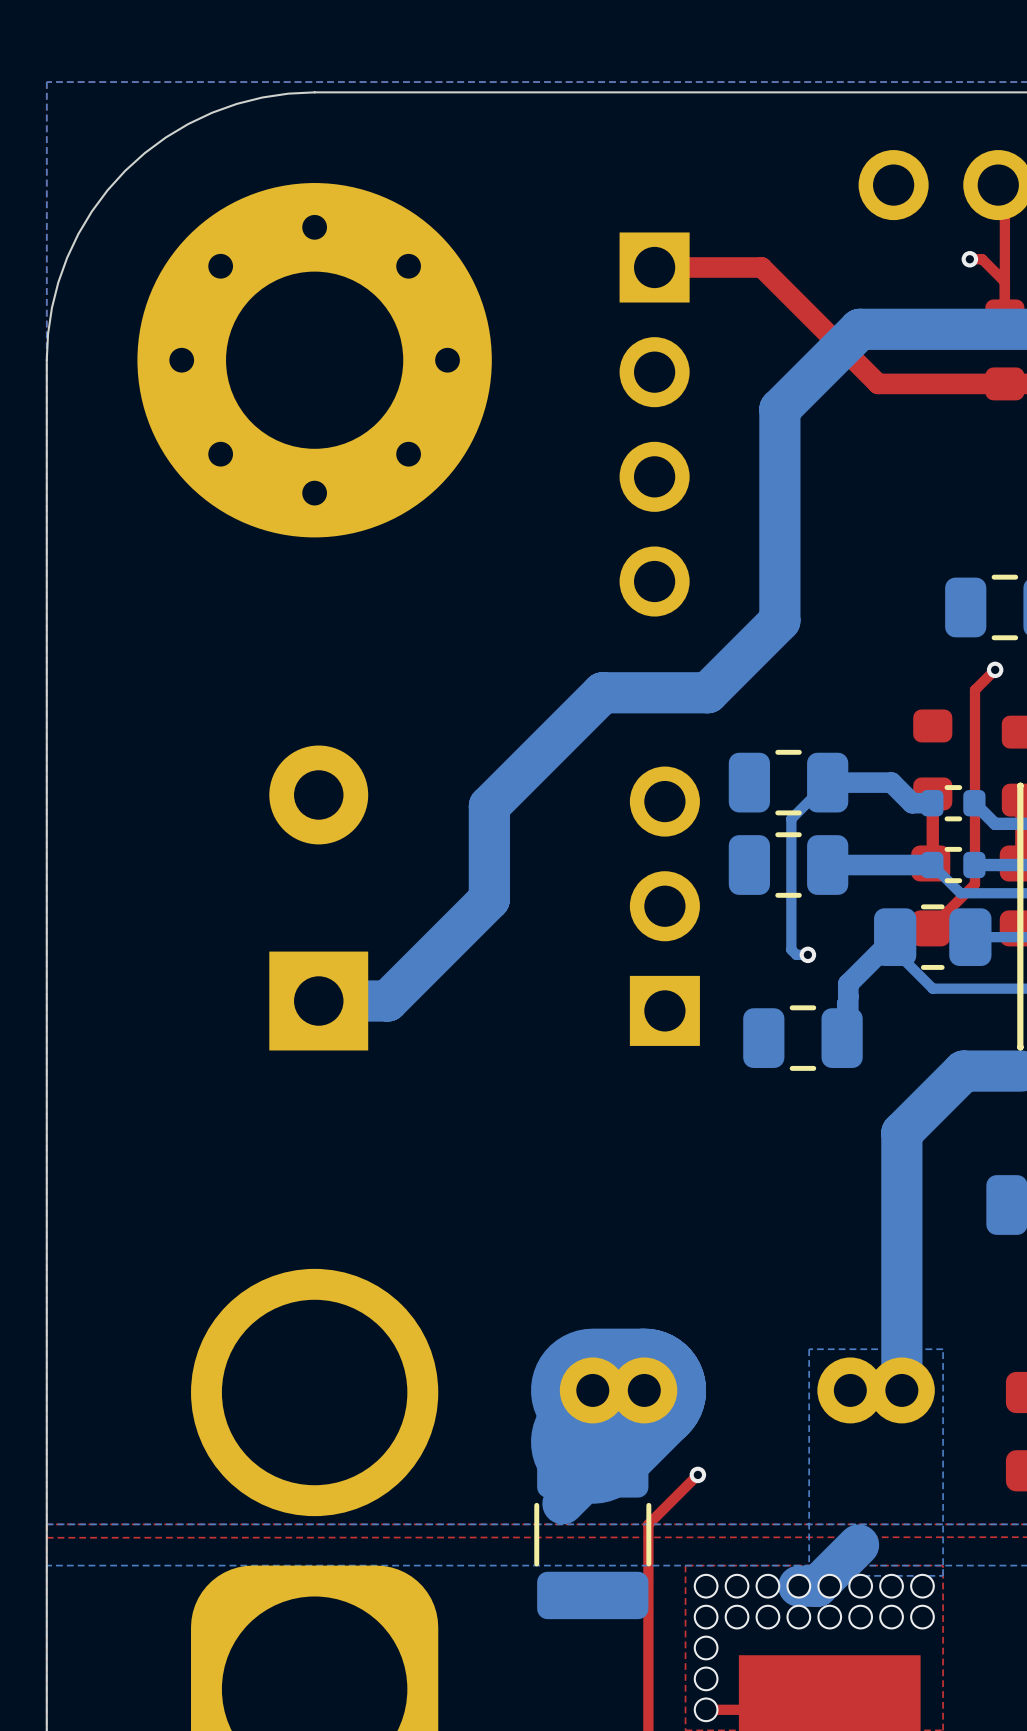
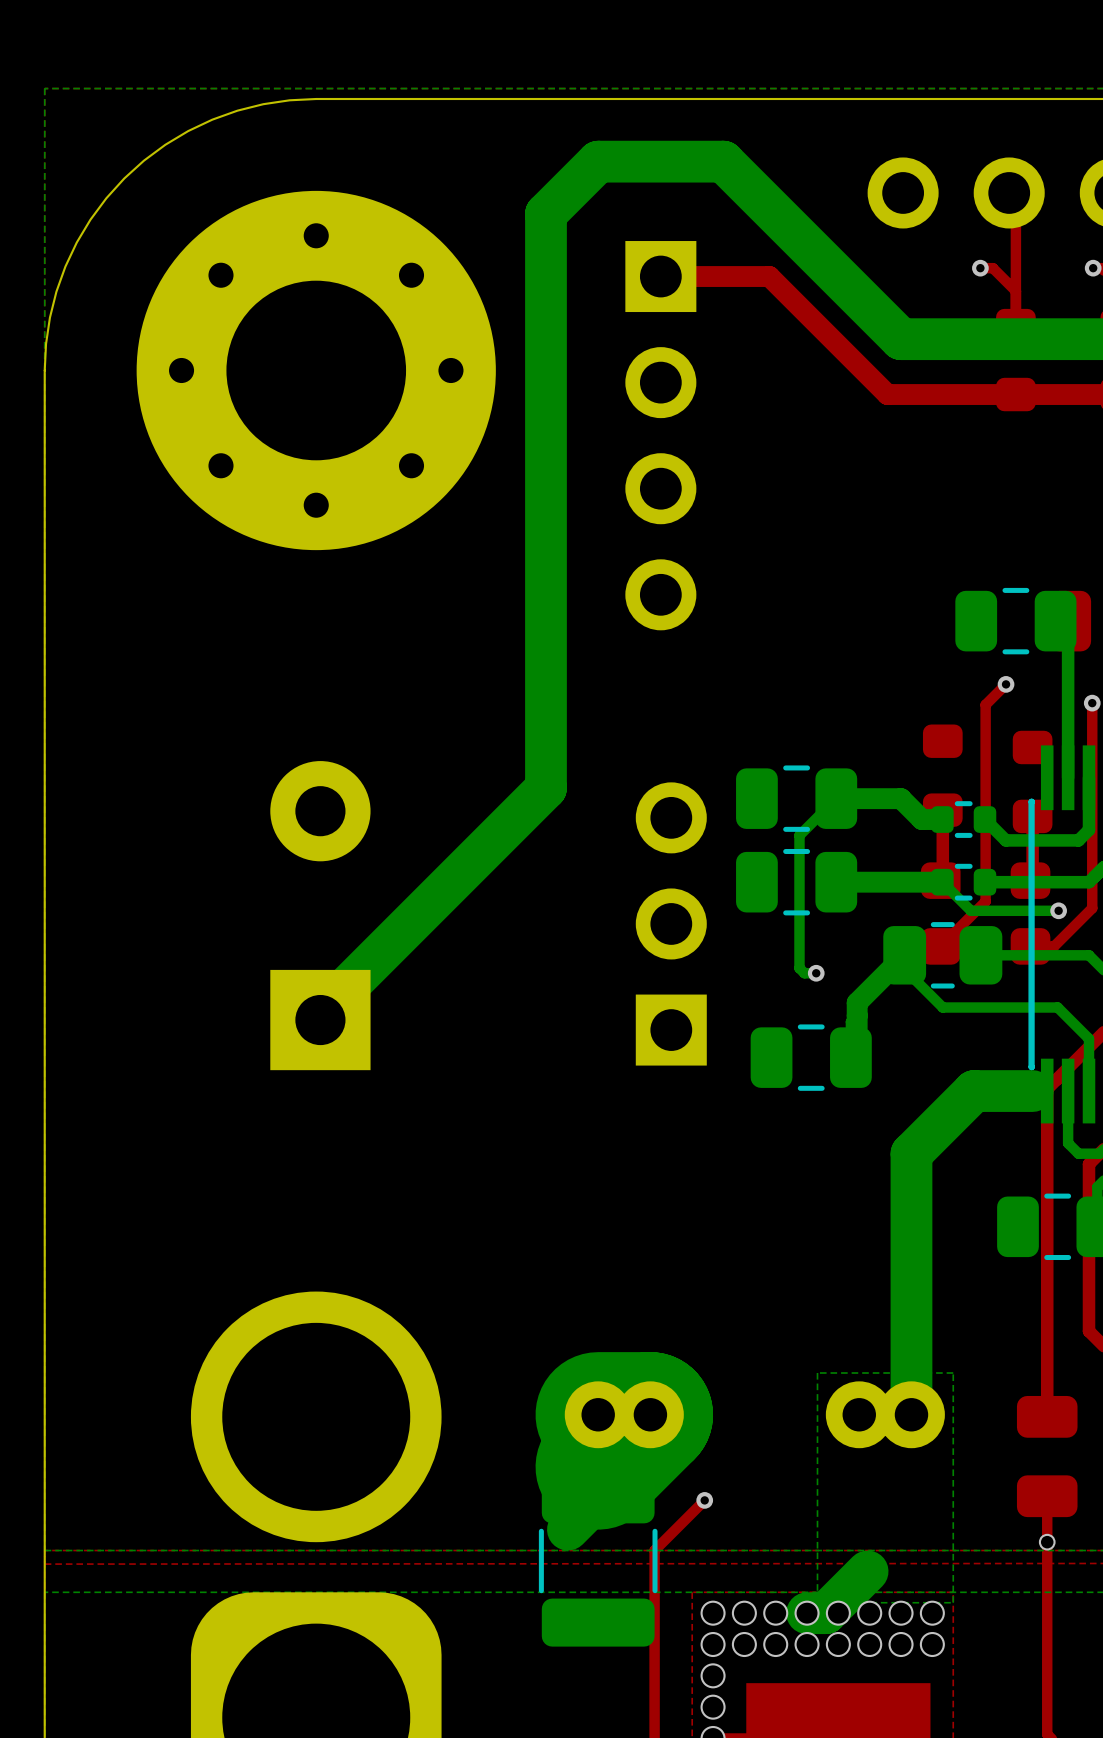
bottom track: (891, 329) (859, 329) (779, 409) (779, 620) (707, 692) (602, 692) (489, 806) (489, 899) (387, 1001) (318, 1001) -> (901, 339) (723, 161) (598, 161) (545, 213) (545, 788) (317, 1016)

